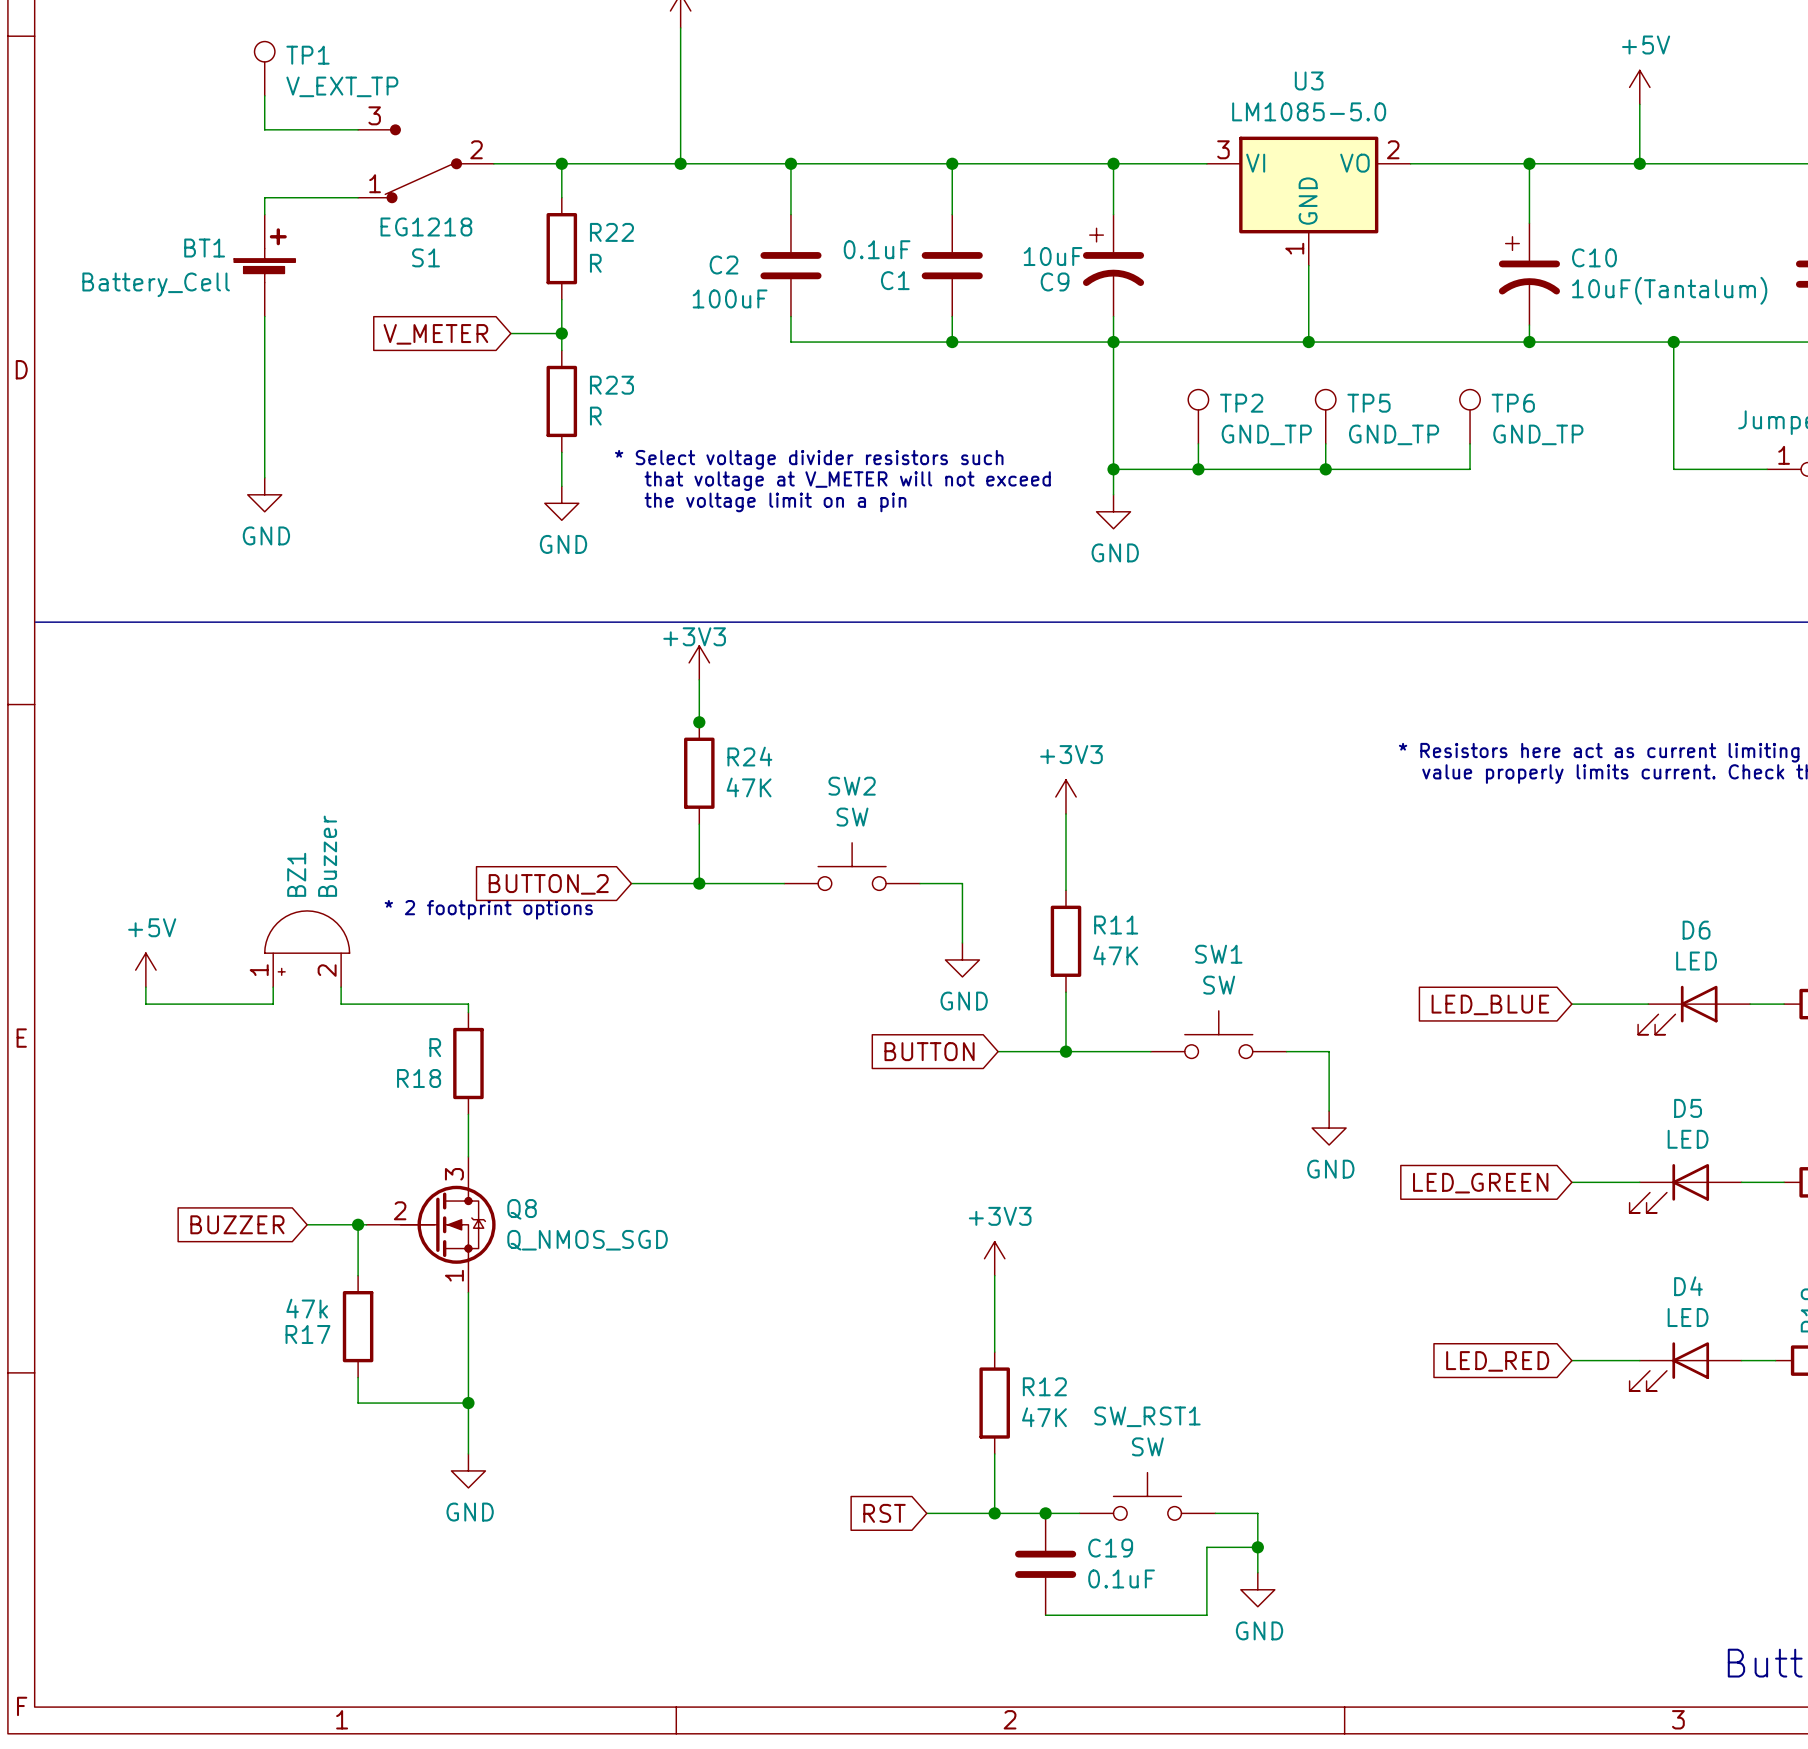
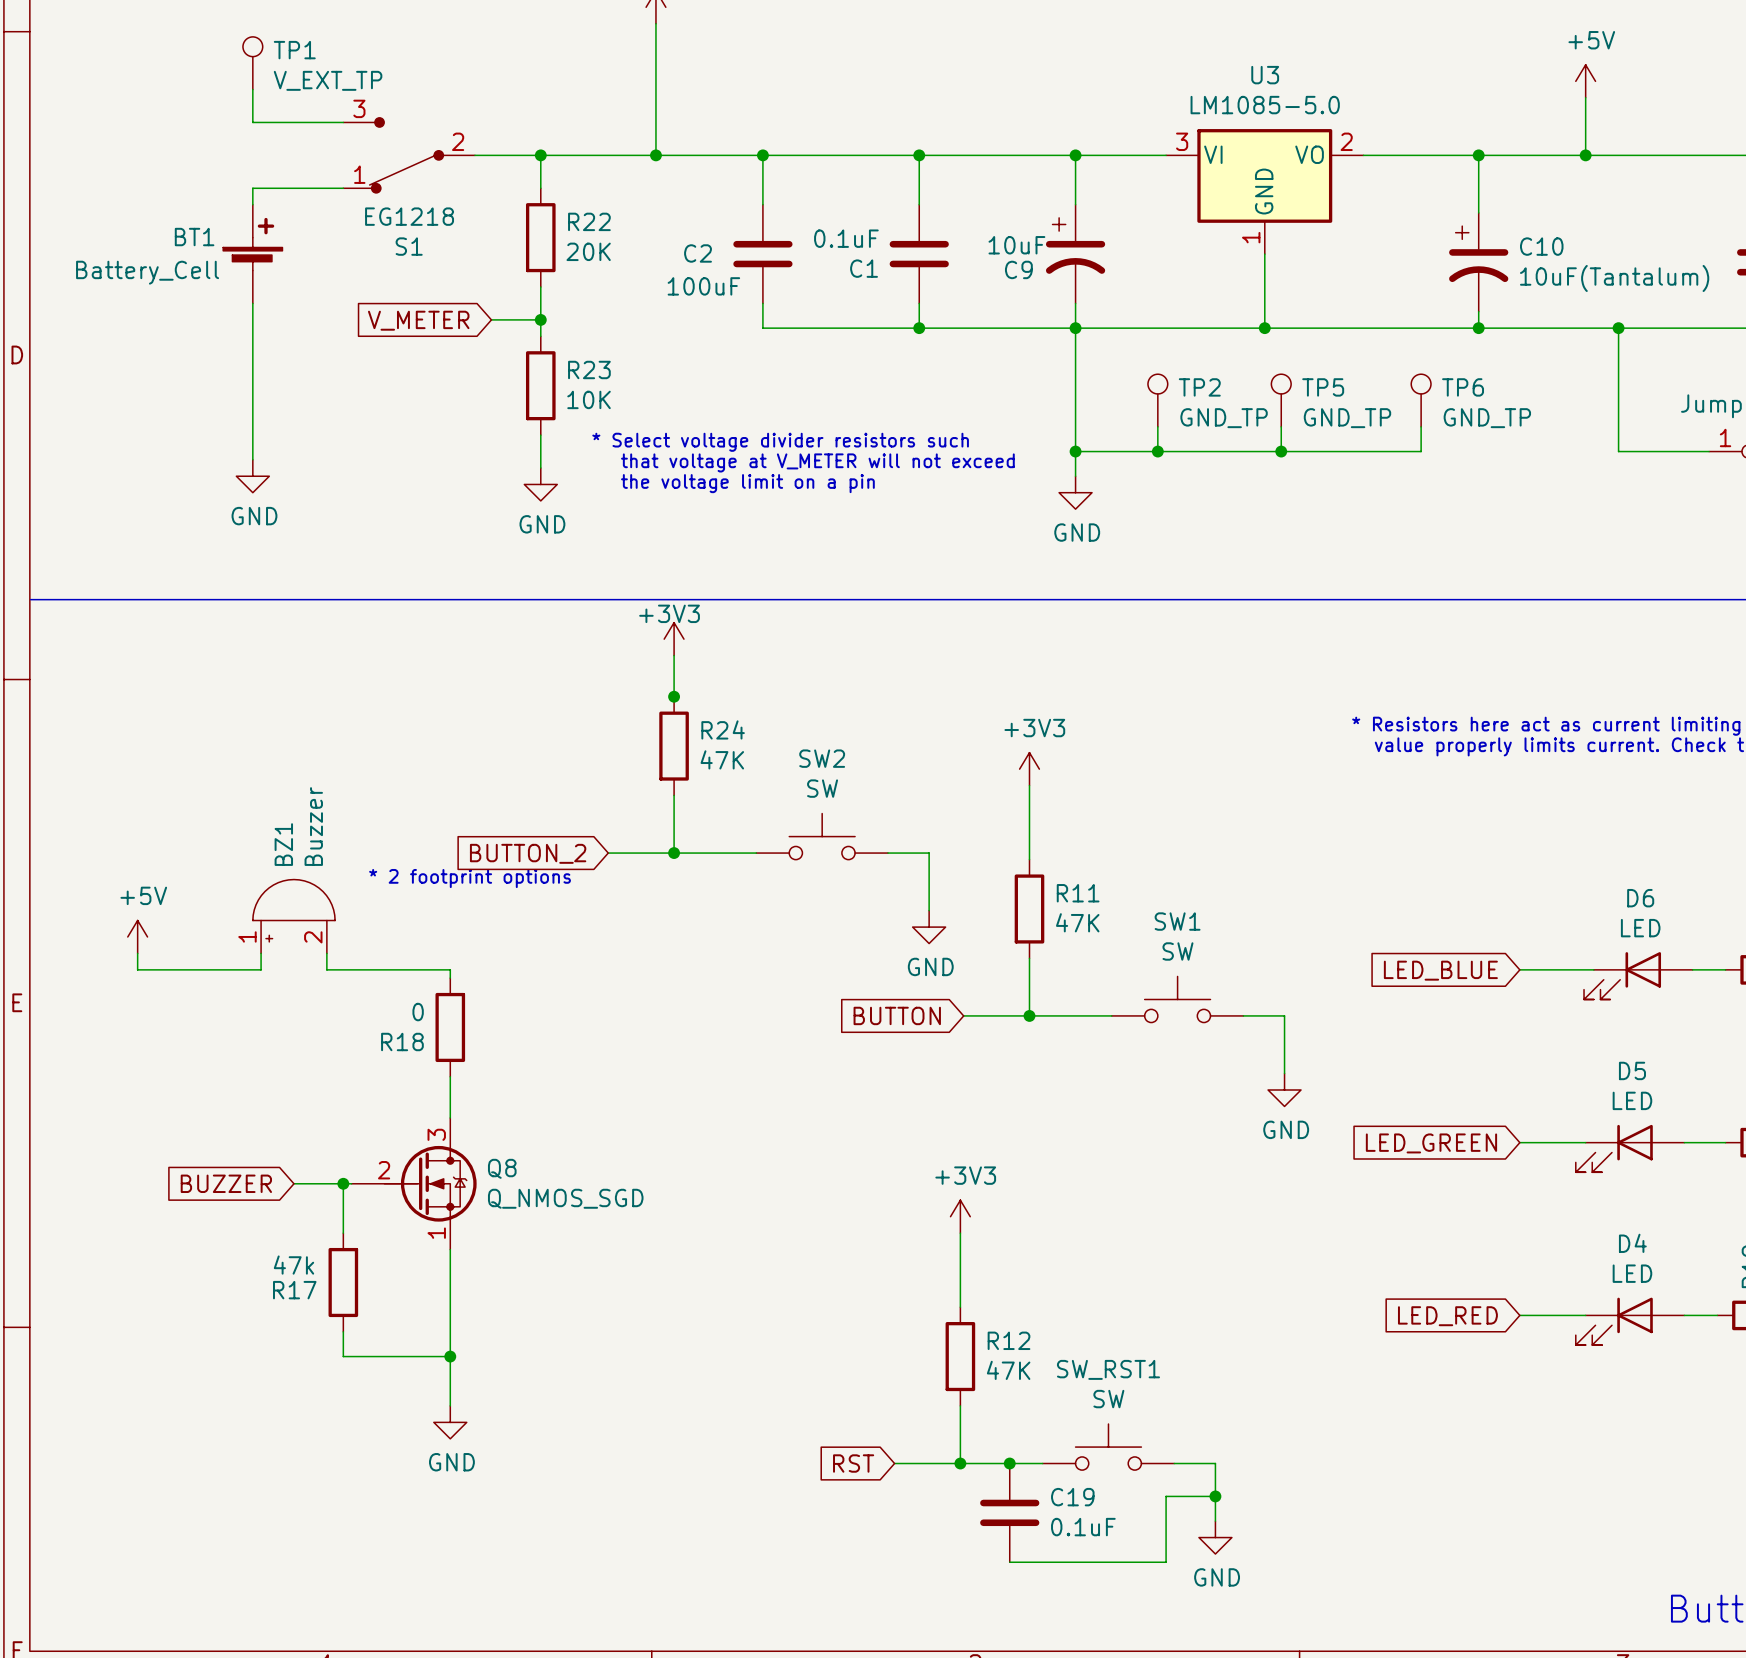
R22 value: R (595, 263) -> 20K (588, 251)
R23 value: R (595, 416) -> 10K (589, 399)
R18 value: R (435, 1047) -> 0 (418, 1012)

